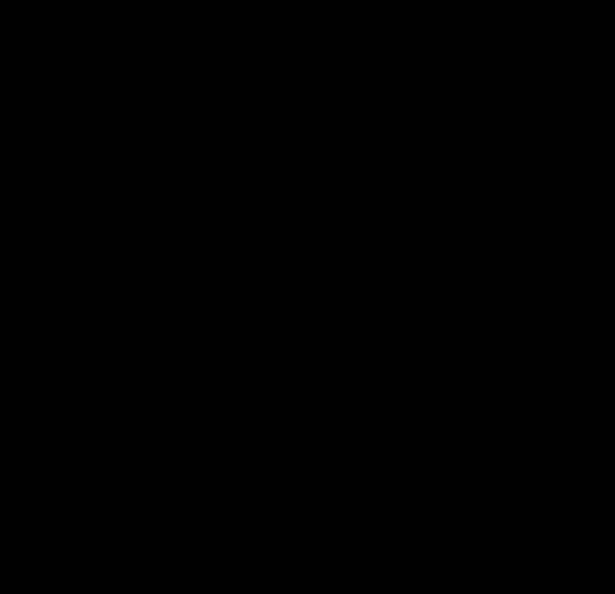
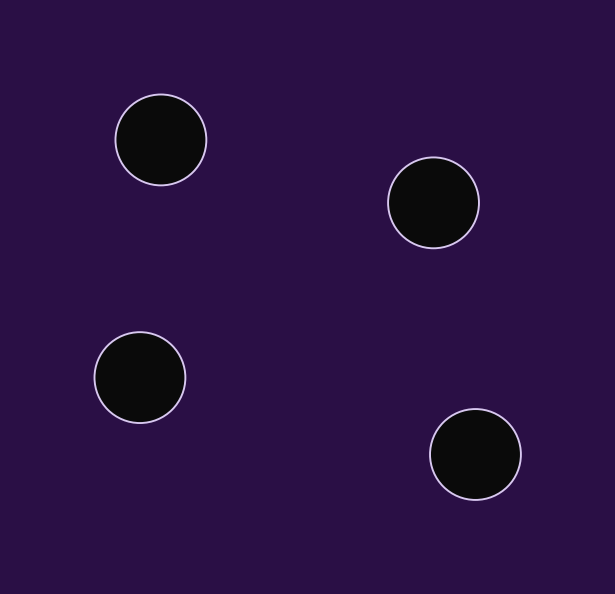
part: none -> (160, 139)
part: none -> (433, 202)
part: none -> (139, 377)
part: none -> (475, 454)

